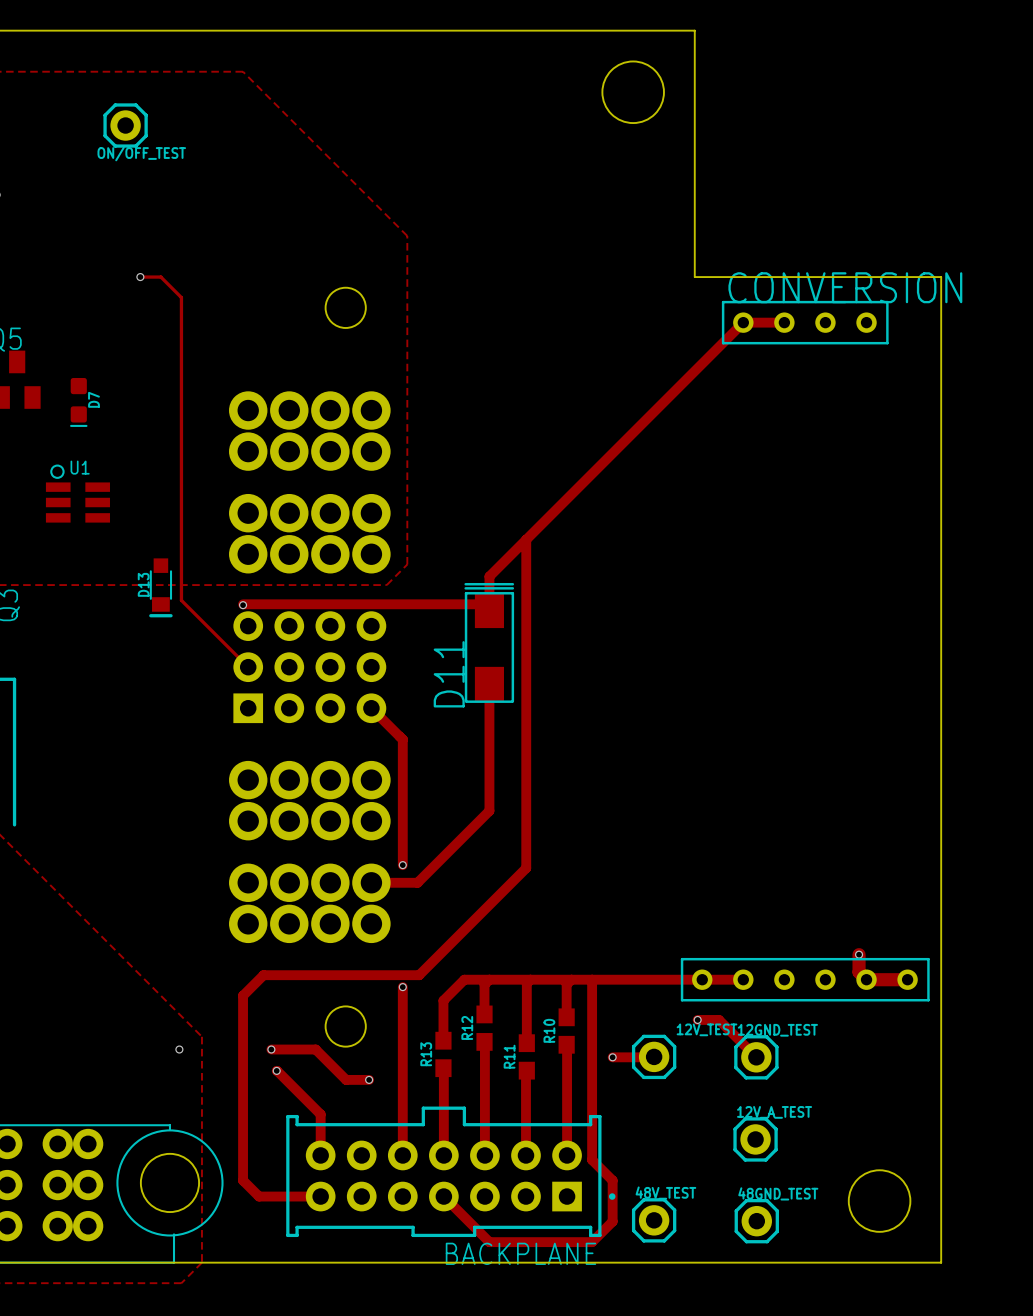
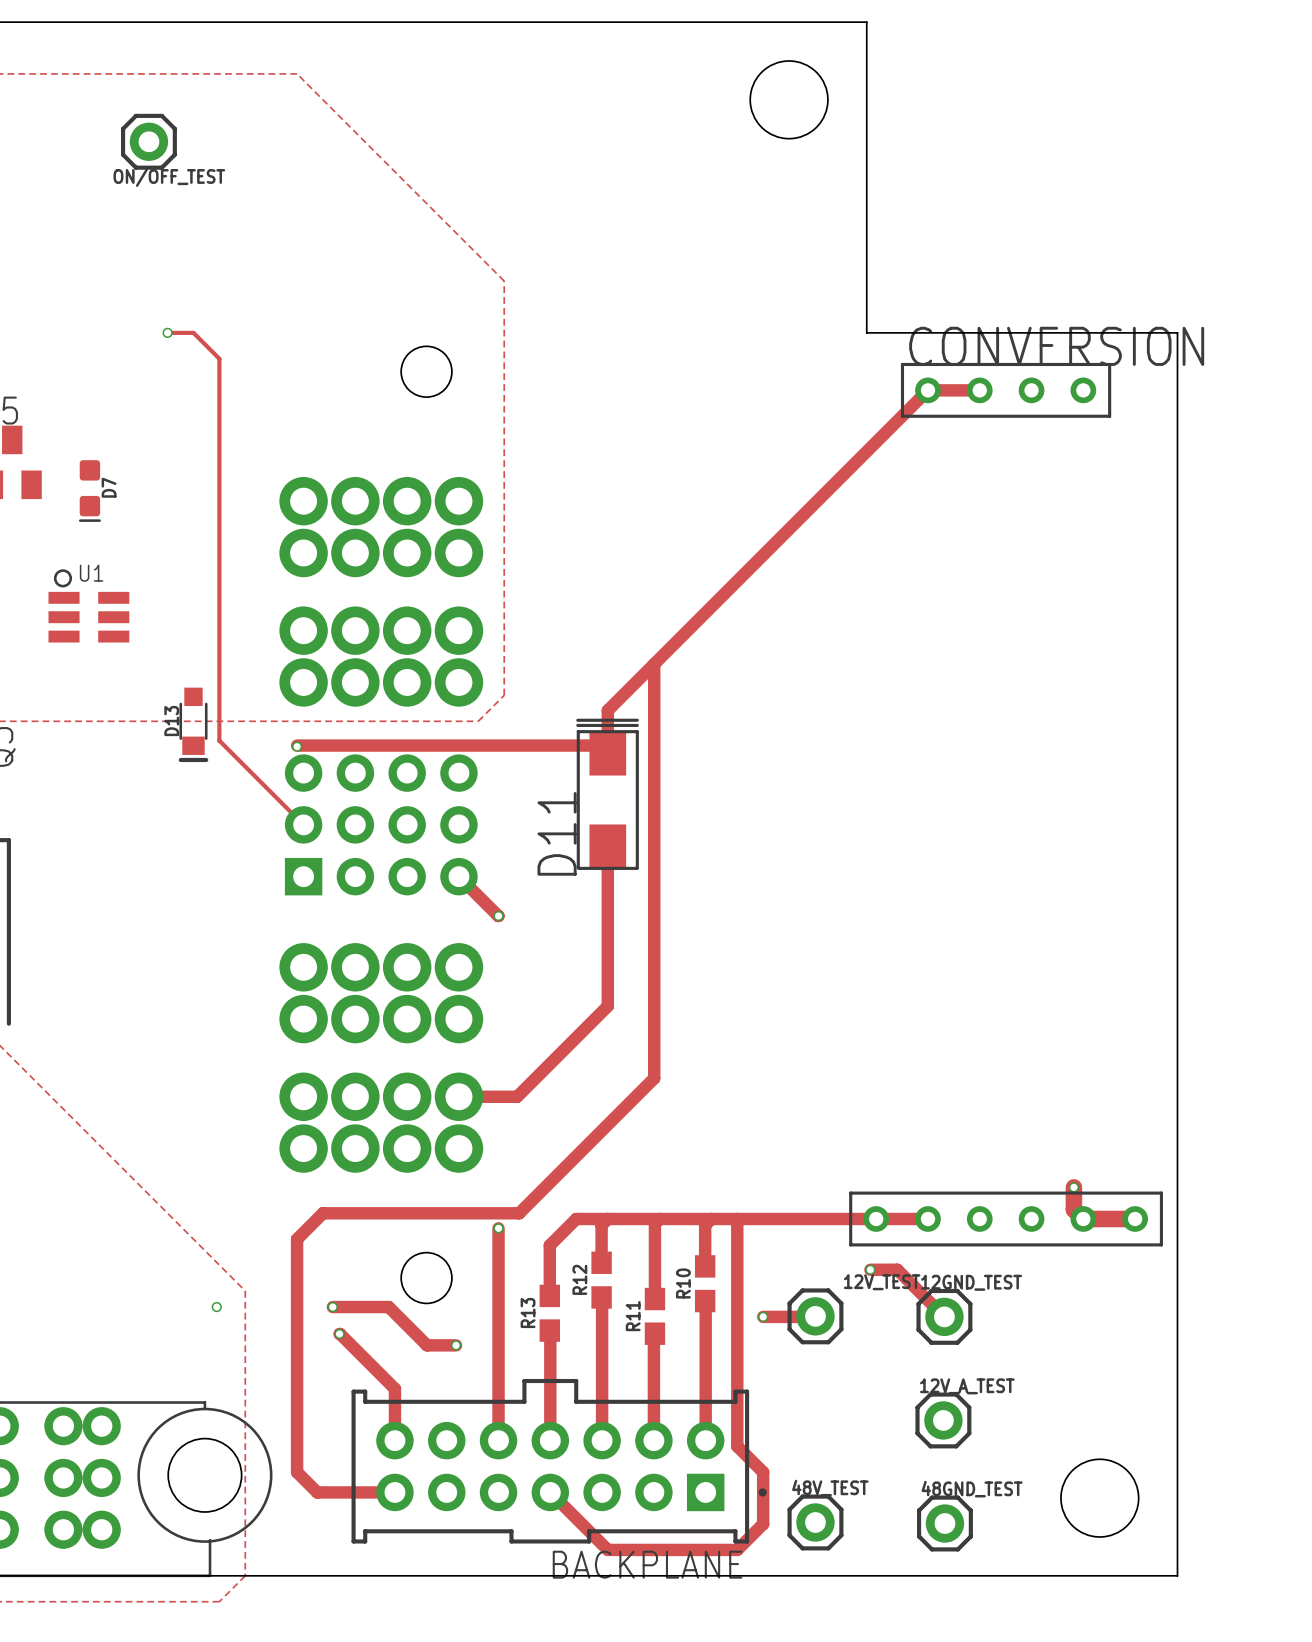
track: (402, 739) (402, 865) -> none
via: none -> (498, 916)
via: (402, 865) -> none

